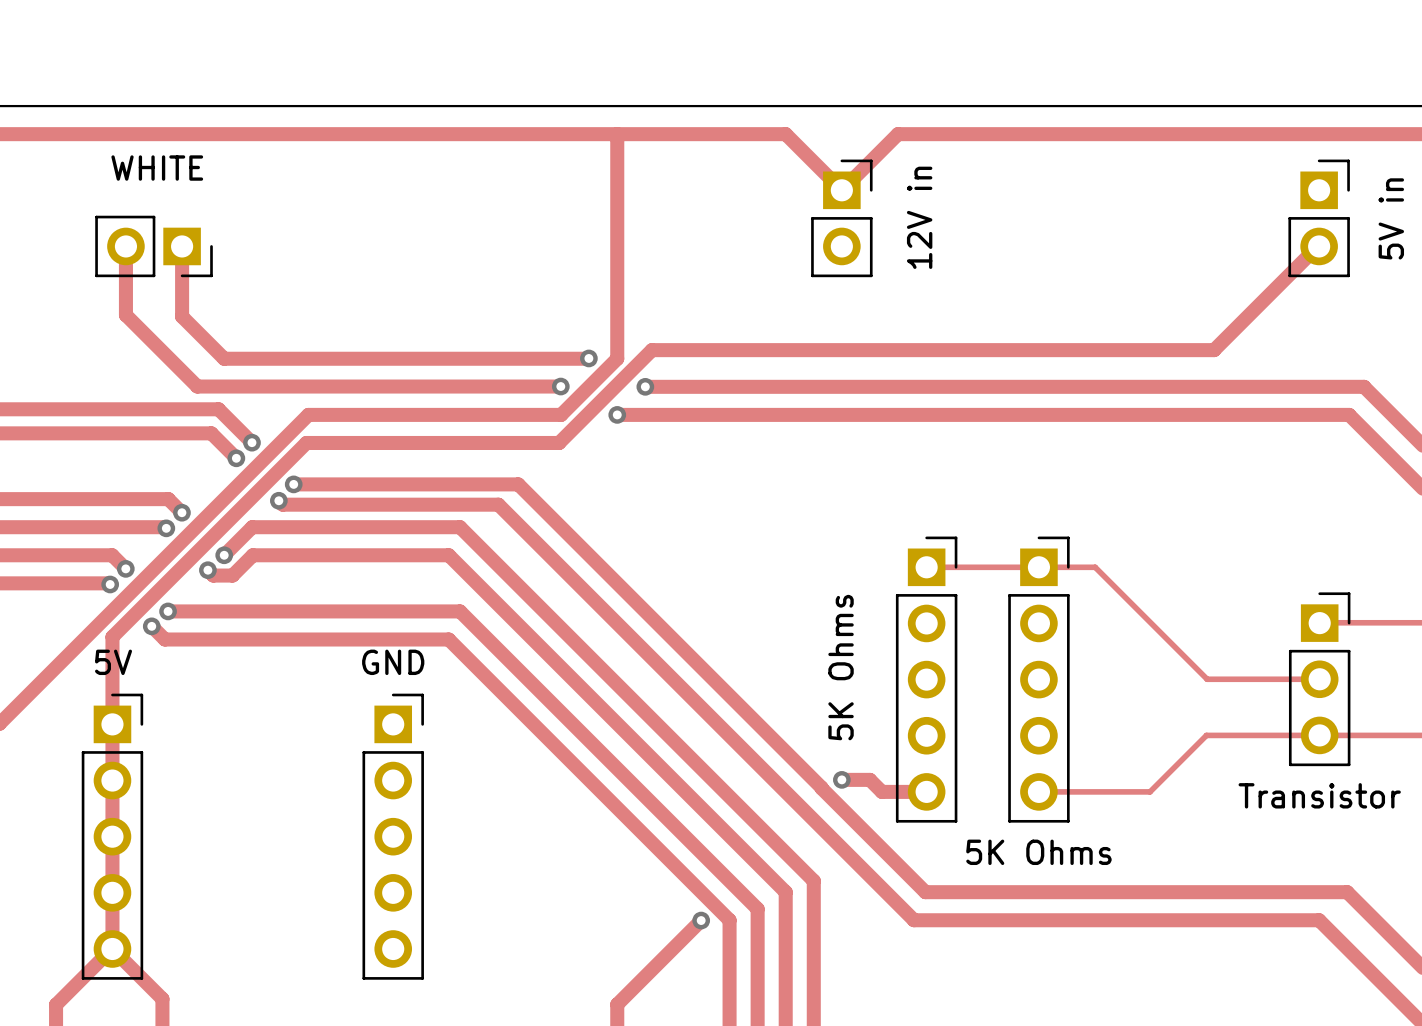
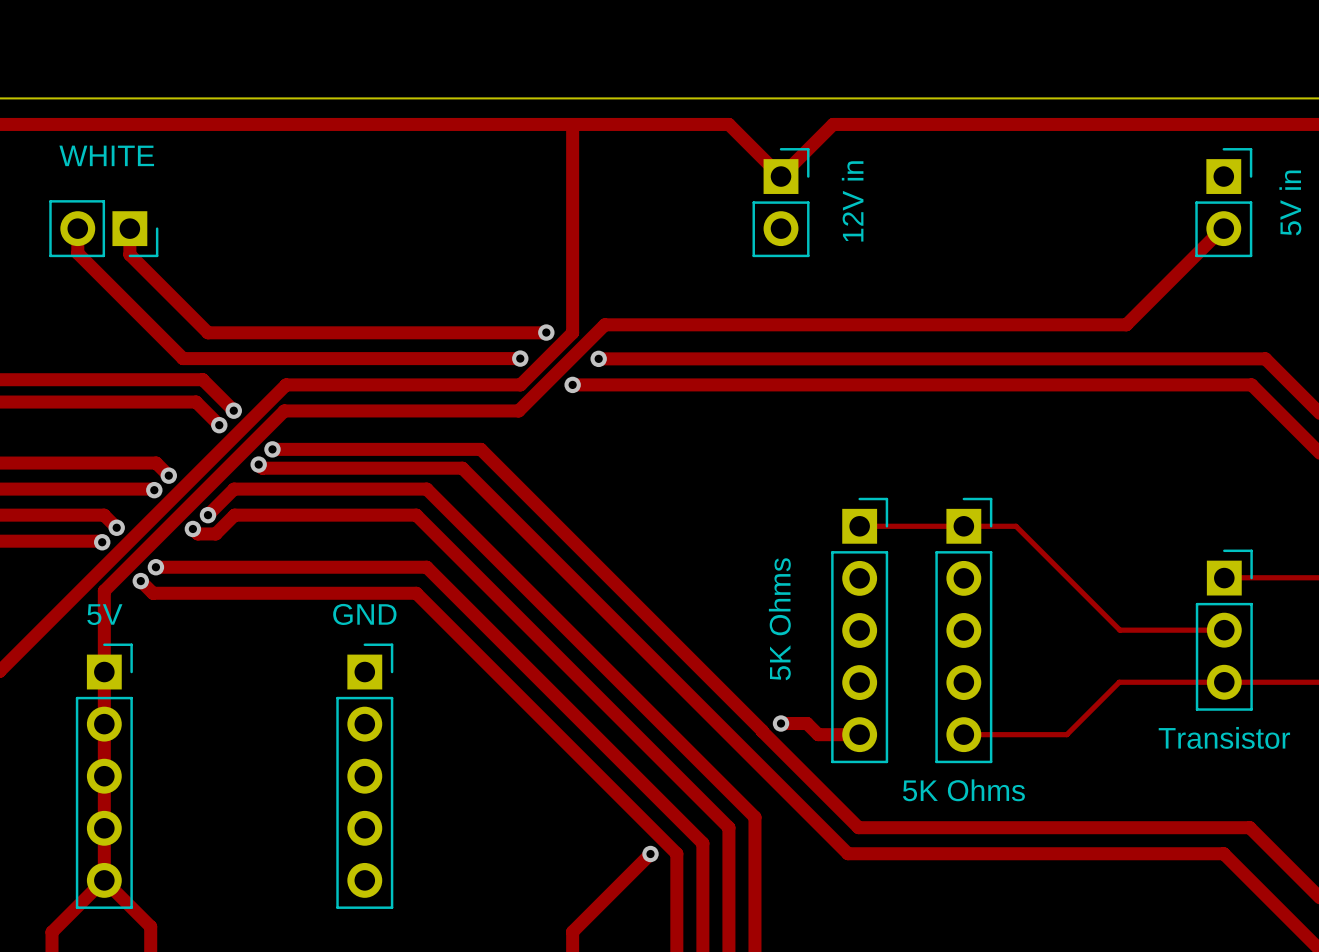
track: (125, 246) (125, 315) -> (77, 228) (77, 253) (116, 292)
part position: (154, 246) -> (103, 228)
track: (182, 246) (182, 316) -> (129, 228) (129, 254) (168, 293)

